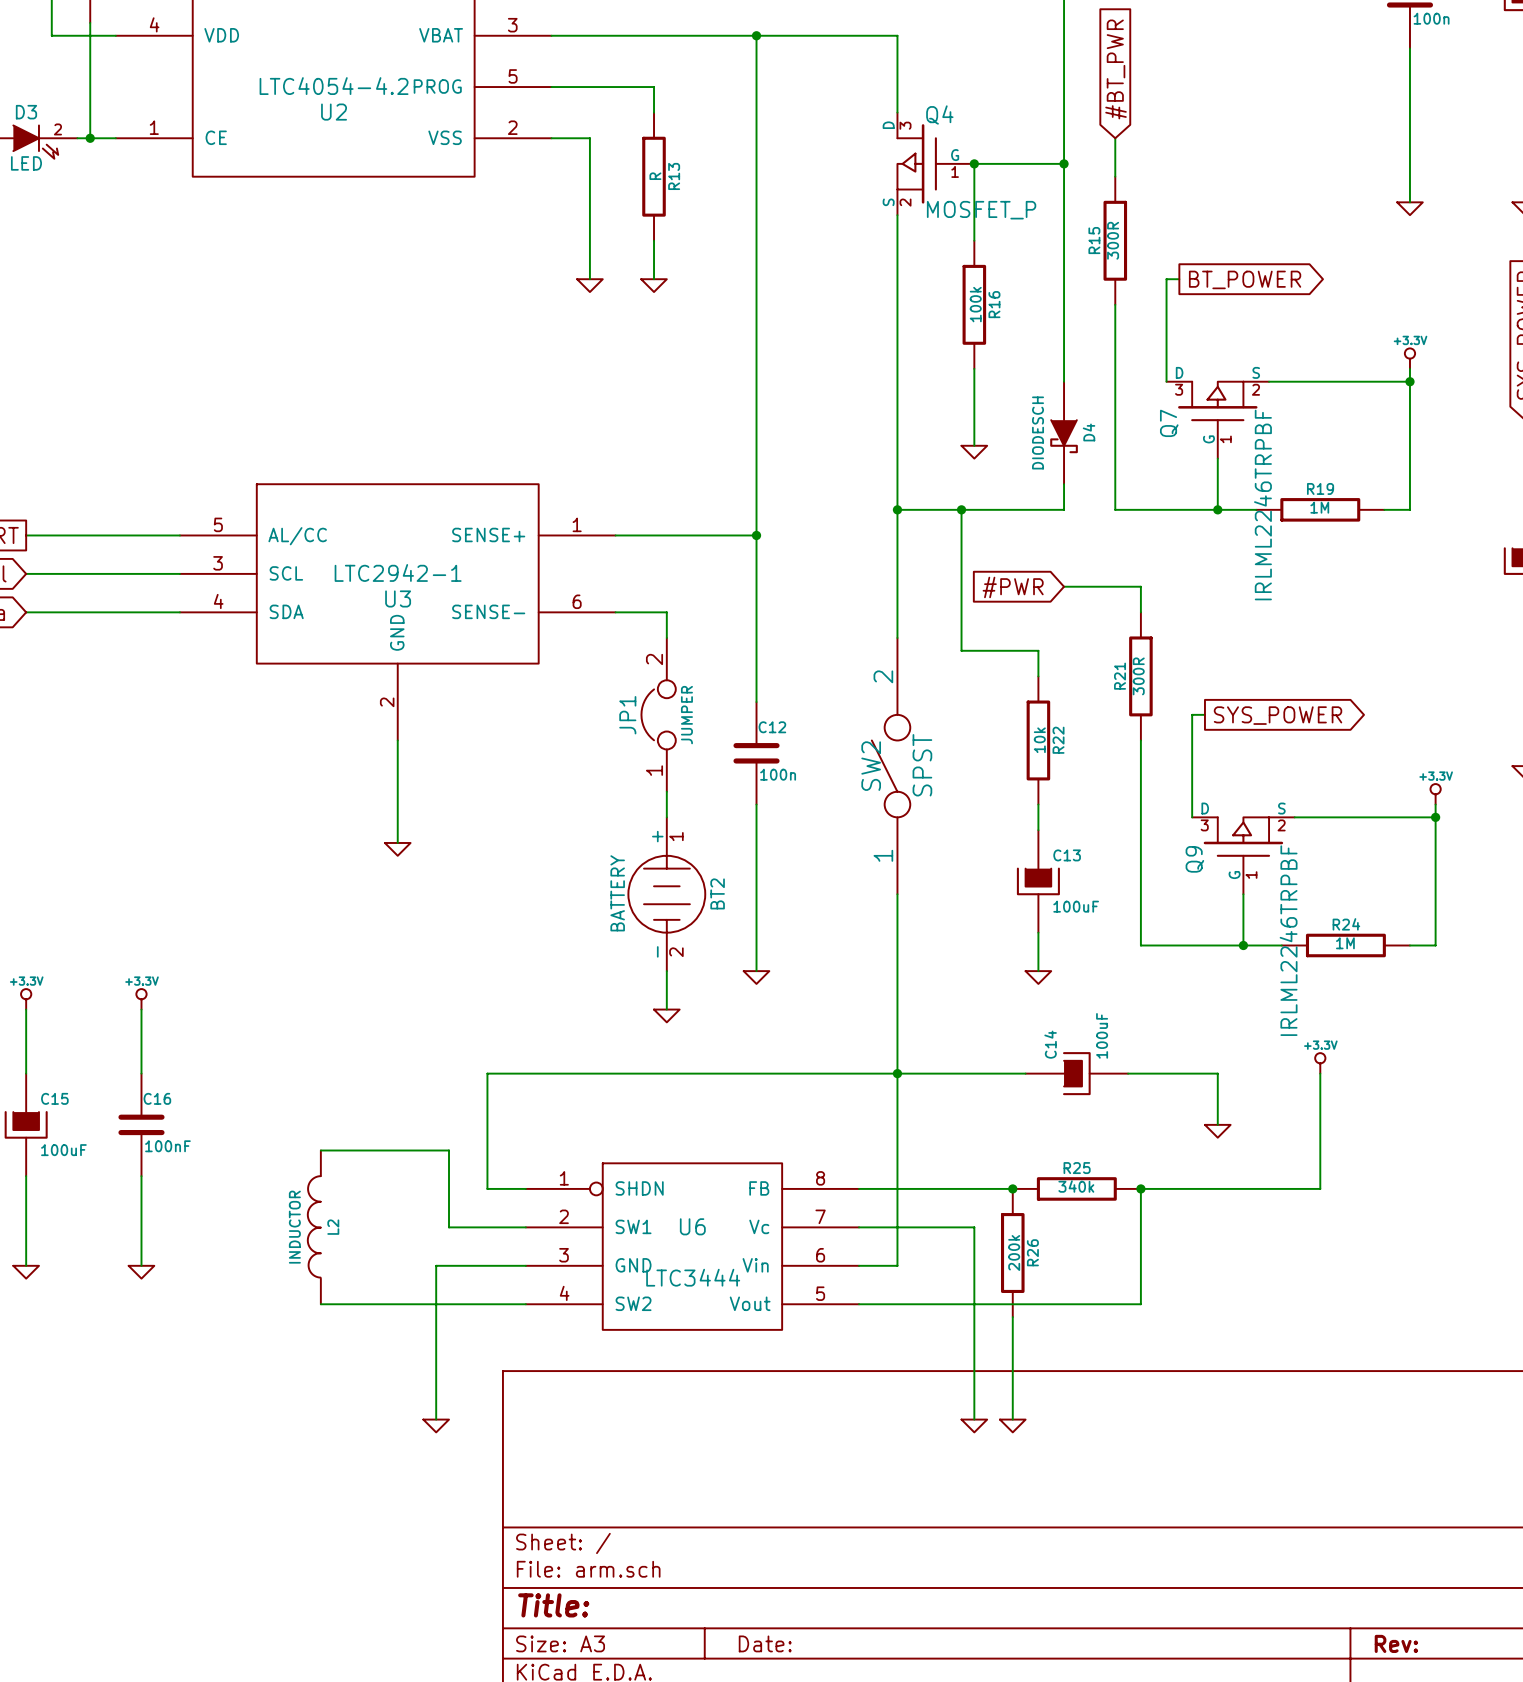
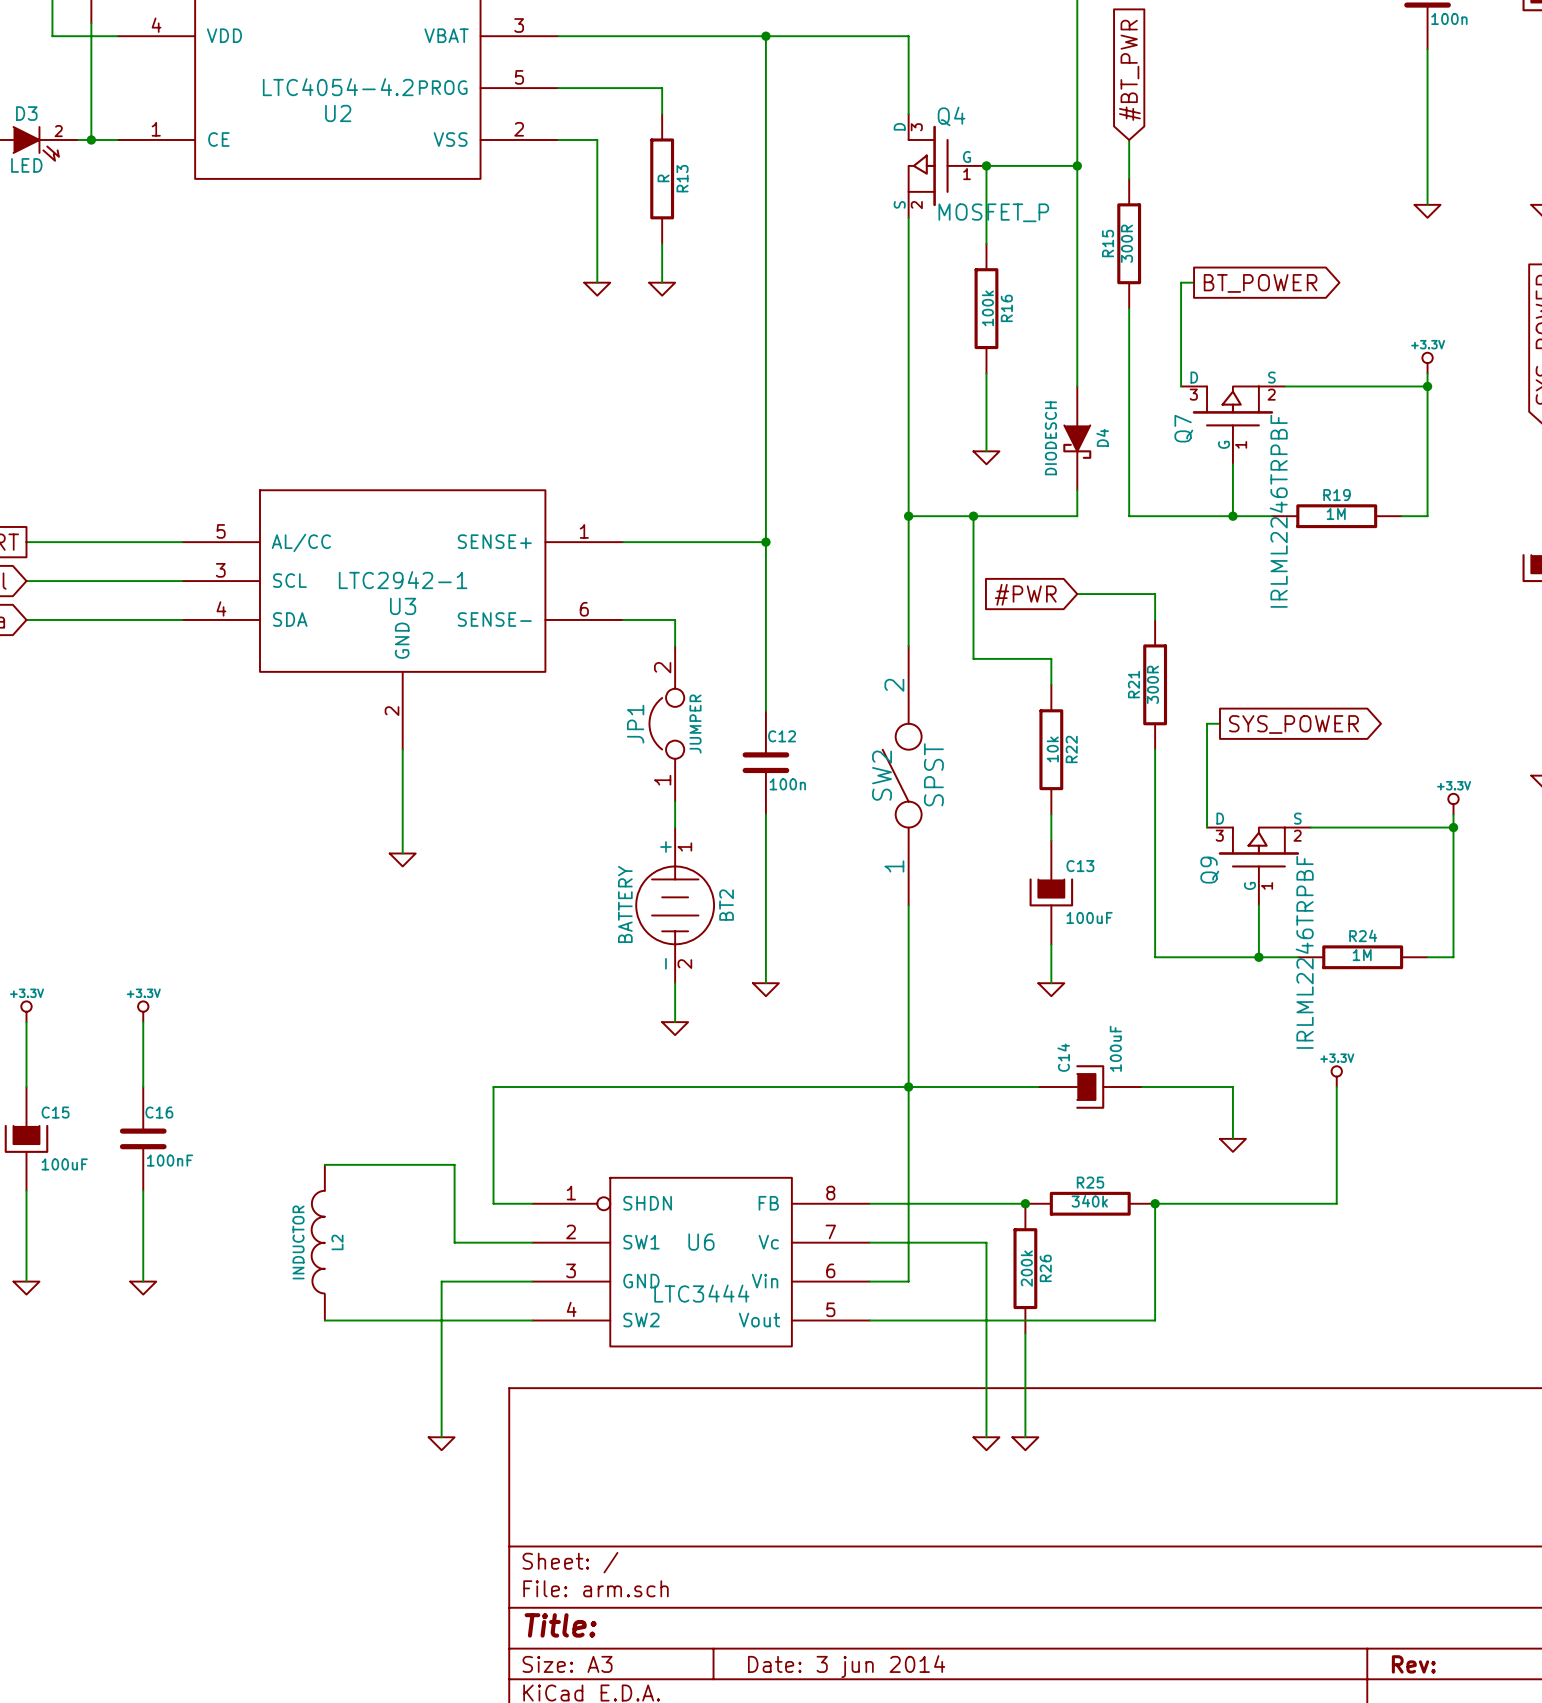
title block: Date: (765, 1643) -> Date: 3 jun 2014 (846, 1666)

